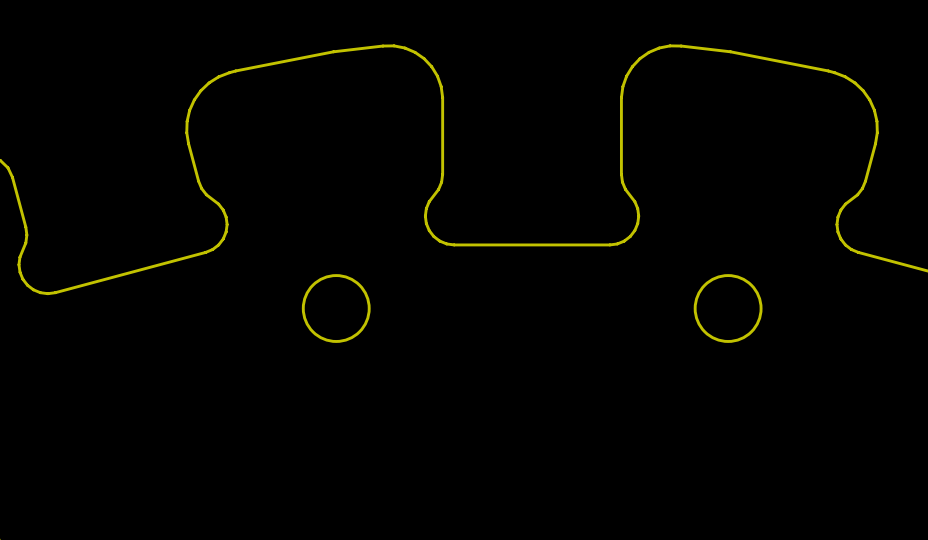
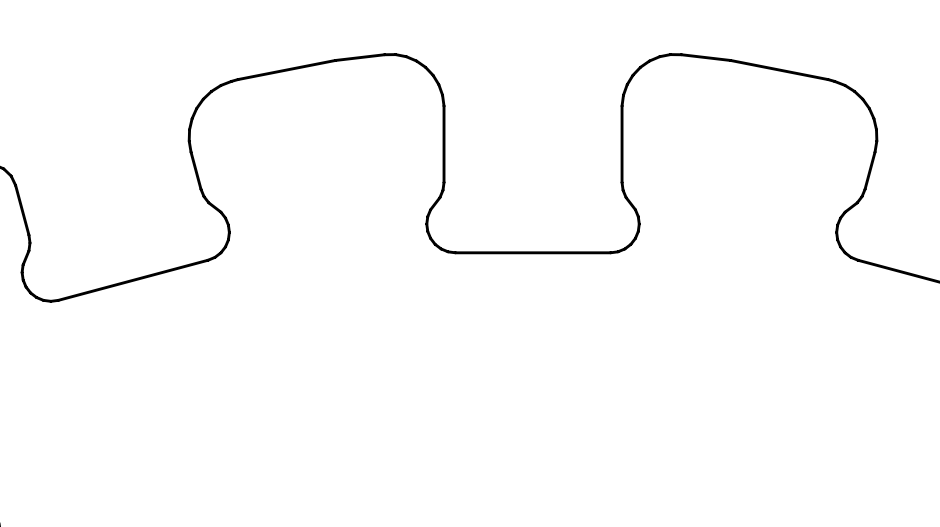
round board edge: [301, 274, 371, 343] -> none
round board edge: [693, 274, 763, 343] -> none

